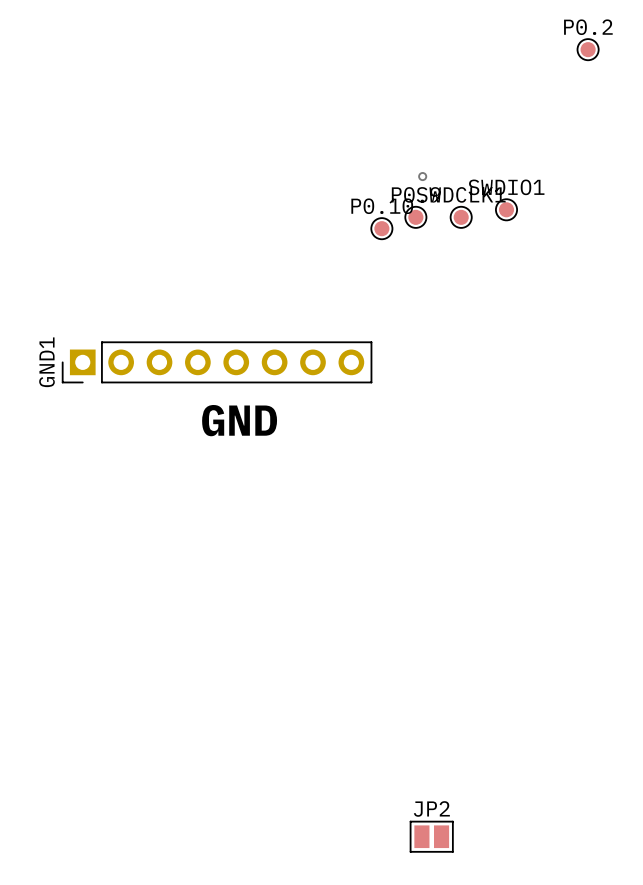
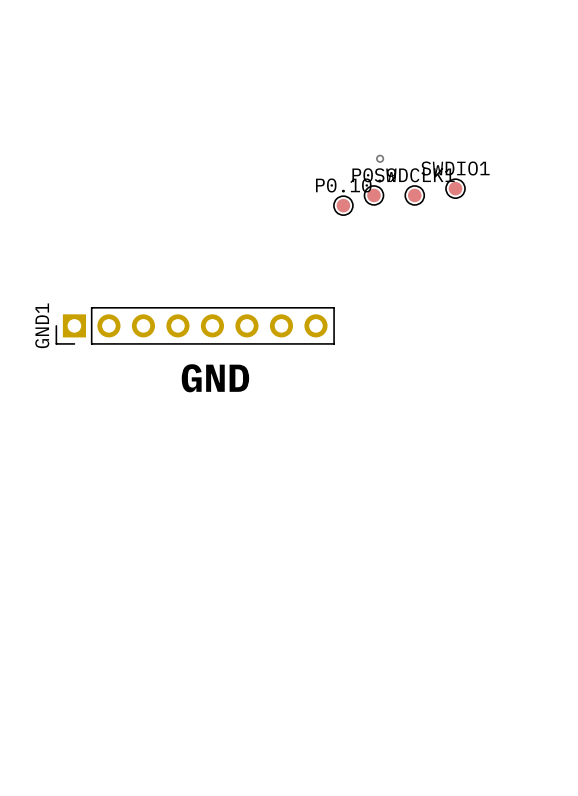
P0.2: (588, 49) -> none
JP2: (431, 836) -> none

